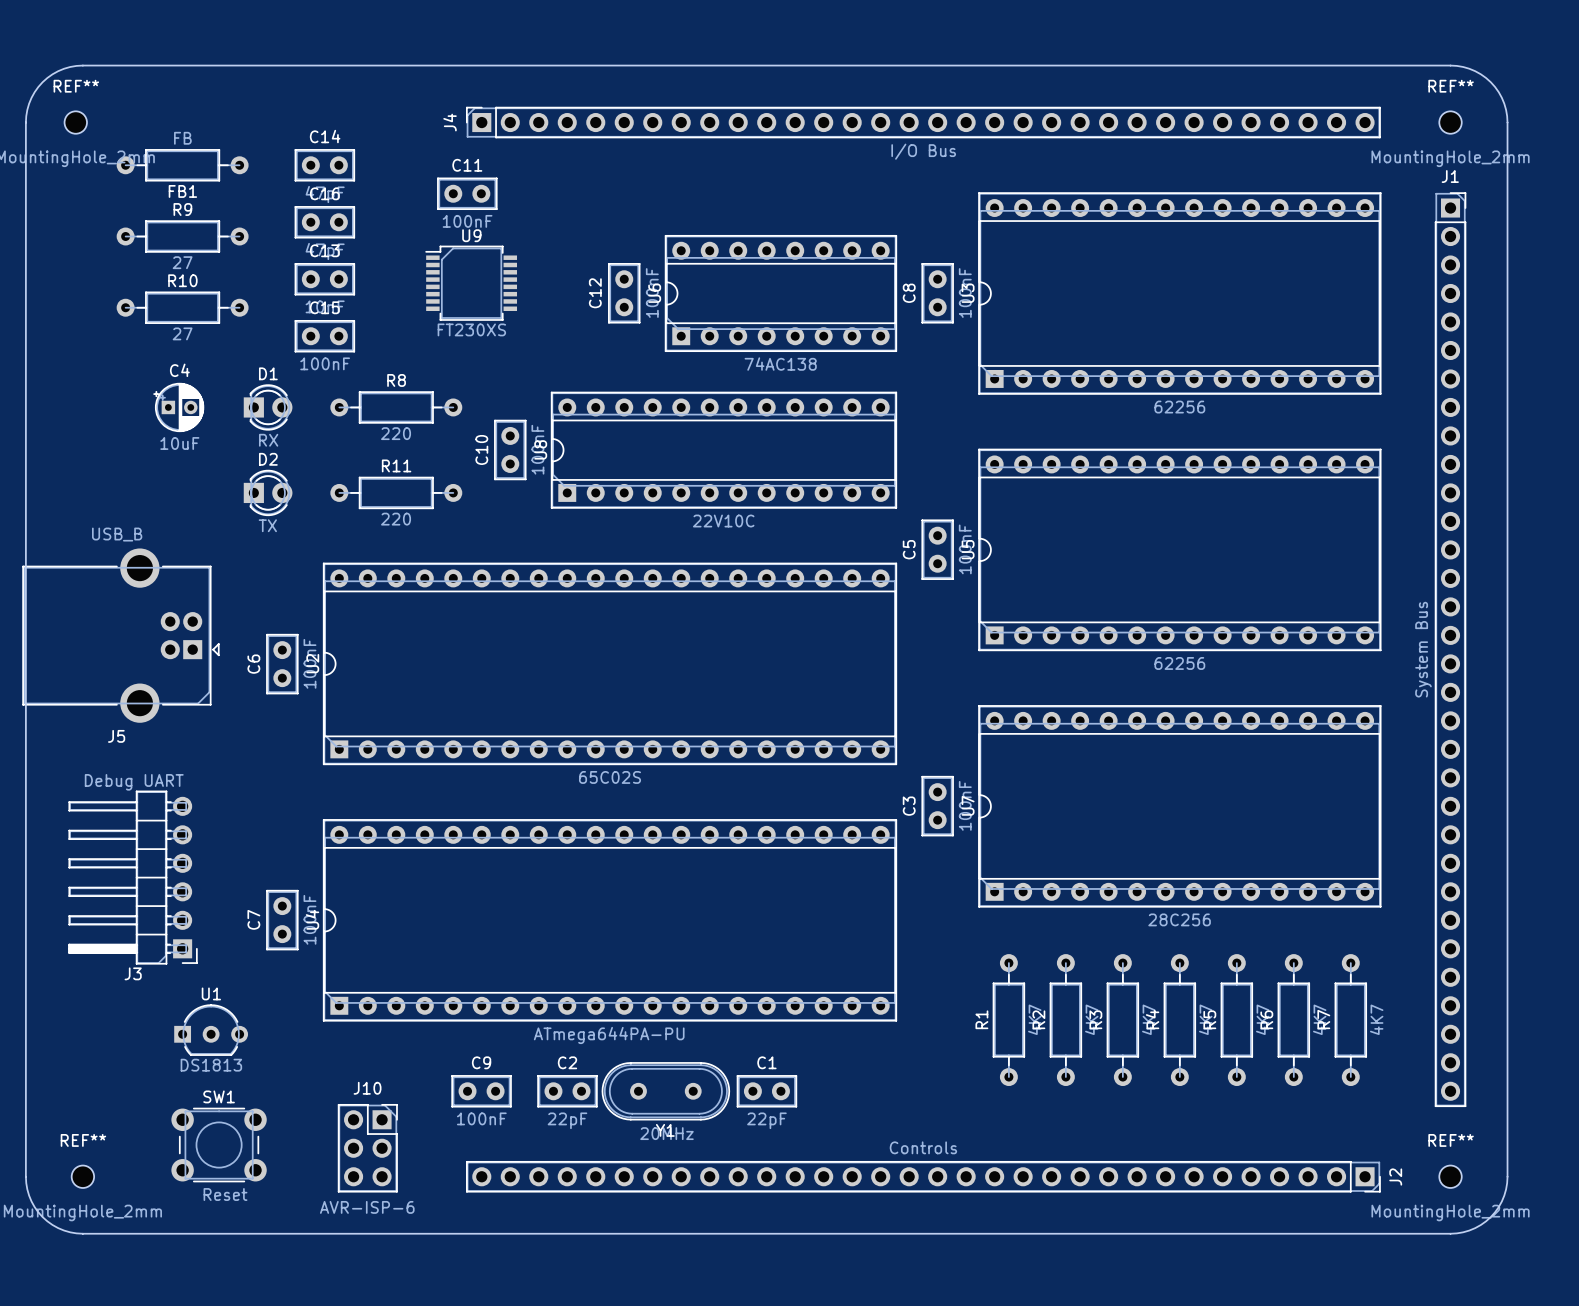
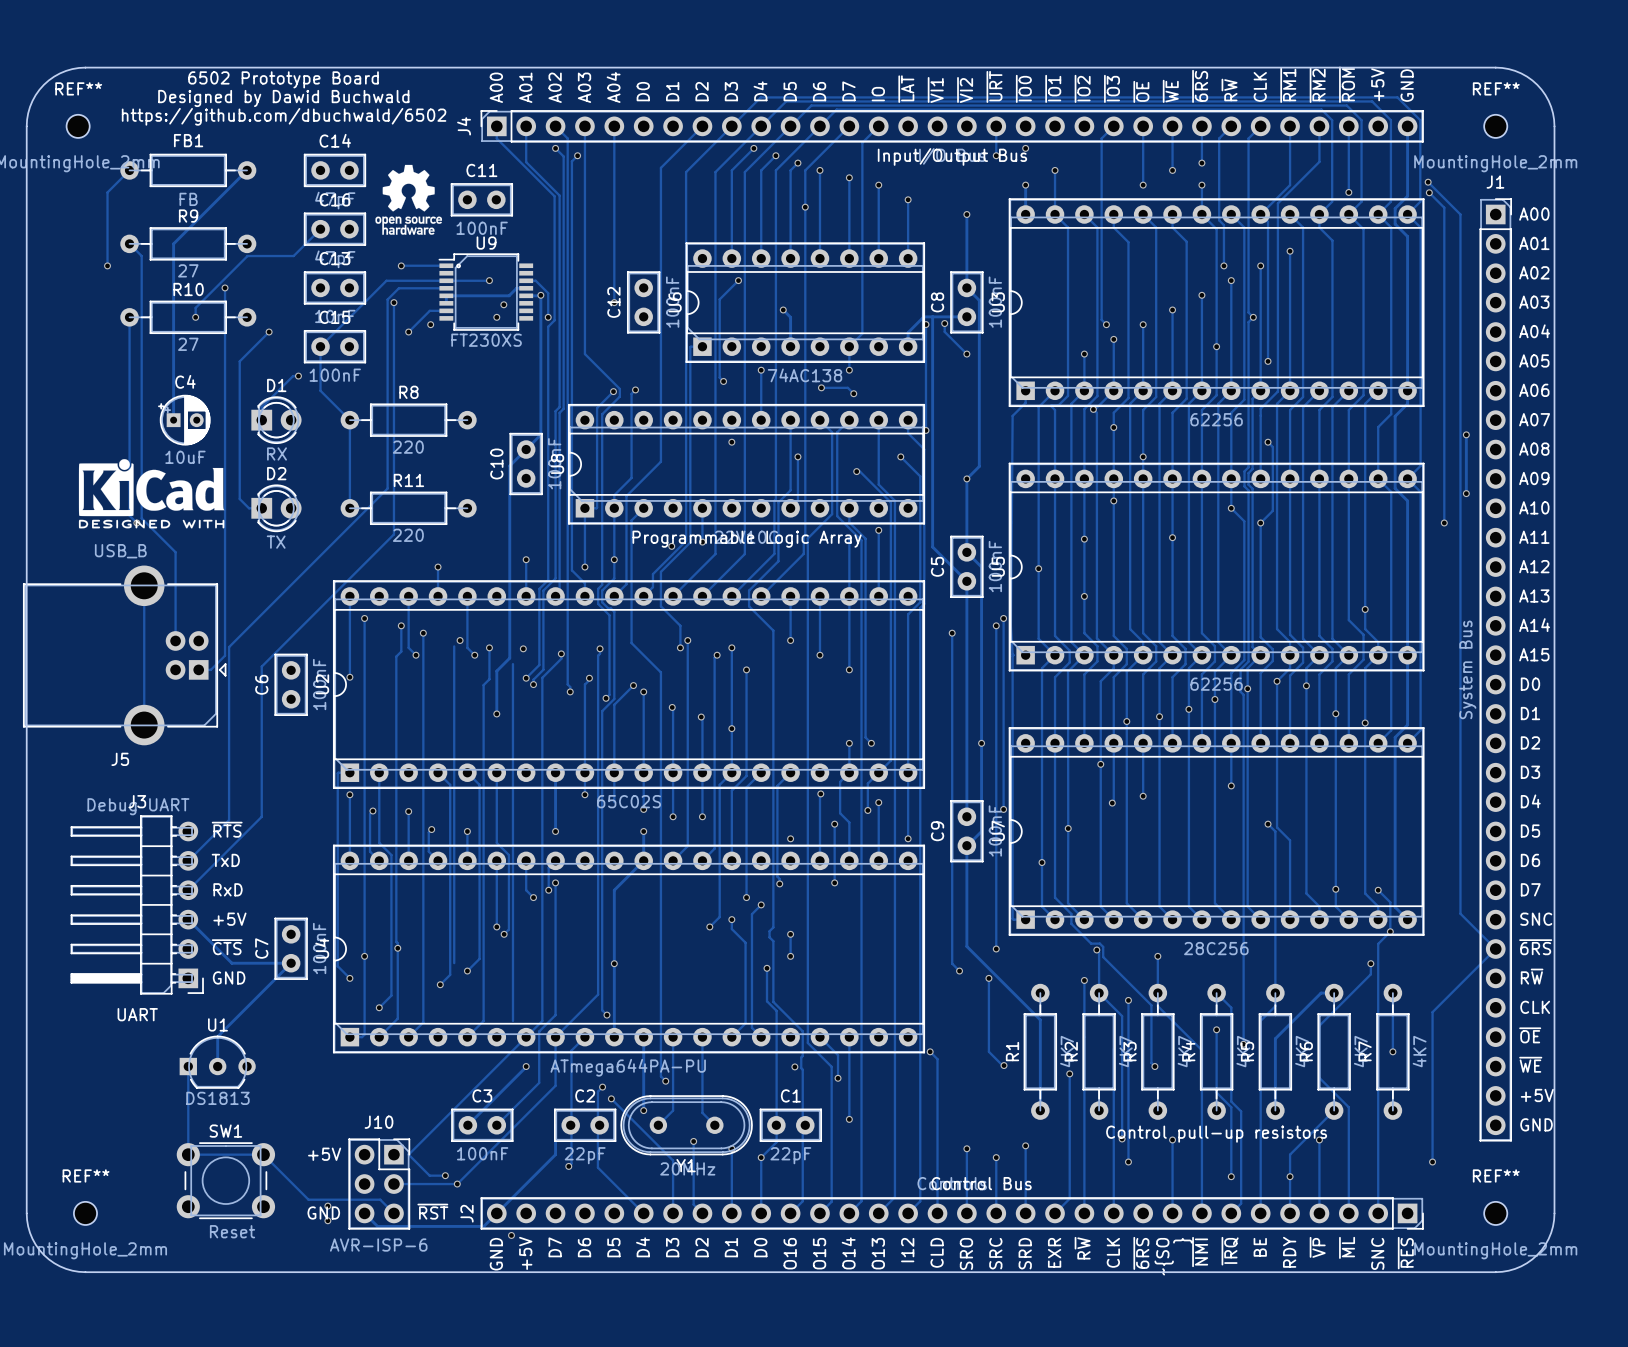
text: none -> 6502 Prototype Board (283, 79)
text: none -> ~{RM1} (1288, 85)
text: none -> ~{RM2} (1317, 85)
text: none -> ~{ROM} (1347, 84)
text: none -> +5V (1377, 84)
text: none -> GND (1407, 85)
text: none -> ~{6RS} (1200, 86)
text: none -> A04 (613, 87)
text: none -> ~{URT} (994, 86)
text: none -> CLK (1260, 86)
text: none -> A00 (496, 87)
text: none -> A01 (525, 87)
text: none -> A02 (555, 87)
text: none -> A03 (584, 87)
text: none -> ~{LAT} (906, 89)
text: none -> ~{IO0} (1023, 88)
text: none -> ~{IO1} (1053, 88)
text: none -> ~{IO2} (1082, 88)
text: none -> ~{IO3} (1112, 88)
text: none -> ~{VI1} (935, 89)
text: none -> ~{VI2} (965, 89)
text: none -> R~{W} (1229, 89)
text: none -> D0 (643, 91)
text: none -> D1 (672, 91)
text: none -> D2 (702, 91)
text: none -> D3 (731, 91)
text: none -> D4 (760, 91)
text: none -> D5 (790, 91)
text: none -> D6 (819, 91)
text: none -> D7 (848, 91)
text: none -> ~{WE} (1170, 91)
text: none -> ~{OE} (1141, 91)
text: none -> IO (878, 94)
text: none -> Designed by Dawid Buchwald (283, 98)
text: none -> https://github.com/dbuchwald/6502 (284, 116)
track: none -> (496, 126) (496, 138) (554, 196) (554, 320) (548, 326) (548, 580) (539, 588) (539, 665) (526, 678)
track: none -> (526, 126) (526, 162) (559, 195) (559, 407) (555, 411) (555, 578) (543, 590) (543, 669) (533, 679) (533, 684)
track: none -> (555, 126) (567, 138) (567, 684) (570, 687) (570, 691)
track: none -> (584, 126) (584, 354) (619, 388) (619, 396) (602, 414) (602, 584) (598, 588) (598, 603) (609, 615) (609, 694) (606, 698)
track: none -> (614, 126) (614, 302)
track: none -> (702, 126) (660, 167) (660, 461) (626, 496) (626, 584) (614, 596)
track: none -> (849, 126) (805, 170) (803, 553) (761, 596)
track: none -> (878, 126) (862, 142) (862, 333) (849, 346) (849, 370)
track: none -> (996, 126) (996, 155)
track: none -> (1113, 126) (1101, 138) (1101, 319) (1106, 324)
track: none -> (1143, 126) (1143, 185)
track: none -> (1172, 126) (1172, 170)
track: none -> (1201, 126) (1201, 163)
track: none -> (1231, 126) (1219, 138) (1219, 220) (1223, 225) (1223, 265)
track: none -> (1260, 126) (1248, 138) (1248, 312) (1253, 317) (1248, 322) (1248, 467) (1244, 471) (1244, 486) (1248, 490) (1248, 661) (1240, 669) (1240, 691) (1243, 694) (1243, 1044)
track: none -> (1290, 126) (1290, 185) (1260, 214) (1268, 221) (1268, 361)
track: none -> (1319, 126) (1319, 161) (1277, 203) (1277, 391) (1260, 408) (1260, 478)
track: none -> (1348, 126) (1348, 192)
track: none -> (1407, 126) (1407, 196) (1395, 208) (1395, 224) (1407, 236) (1407, 403) (1395, 416) (1395, 488) (1407, 500) (1407, 724) (1395, 737) (1395, 907) (1407, 919)
FB1 value position: FB (182, 138) -> FB (188, 199)
track: none -> (555, 148) (563, 156) (563, 408) (559, 412) (559, 592) (555, 596)
via: none -> (555, 148)
track: none -> (753, 148) (731, 170) (731, 258)
via: none -> (753, 148)
via: none -> (1025, 148)
track: none -> (577, 155) (571, 161) (571, 570) (584, 583) (584, 596)
via: none -> (577, 155)
track: none -> (775, 155) (761, 170) (761, 258)
via: none -> (775, 155)
via: none -> (996, 155)
text: none -> Input/Output Bus (952, 156)
track: none -> (797, 163) (790, 170) (790, 258)
via: none -> (797, 163)
via: none -> (1201, 163)
drawing: none -> [375, 164, 443, 235]
track: none -> (129, 170) (107, 192) (107, 265)
track: none -> (247, 170) (173, 243) (173, 420)
track: none -> (819, 170) (819, 258)
via: none -> (819, 170)
track: none -> (1055, 170) (1055, 214) (1068, 227) (1068, 395) (1058, 405) (1051, 405) (1055, 410) (1055, 635) (1069, 650) (1069, 662) (1055, 677) (1055, 897) (1071, 913) (1071, 923) (1091, 943) (1099, 943) (1103, 946) (1103, 957) (1151, 1005) (1151, 1063) (1154, 1066)
via: none -> (1055, 170)
via: none -> (1172, 170)
track: none -> (849, 177) (849, 258)
via: none -> (849, 177)
track: none -> (1428, 182) (1460, 214) (1460, 913) (1495, 949) (1432, 1012) (1432, 1162)
via: none -> (1428, 182)
track: none -> (878, 185) (878, 258)
via: none -> (878, 185)
track: none -> (1025, 185) (1025, 214)
via: none -> (1025, 185)
via: none -> (1143, 185)
track: none -> (1201, 185) (1201, 214) (1216, 229) (1216, 395) (1201, 410) (1201, 633) (1214, 646) (1214, 661) (1201, 674) (1201, 743)
via: none -> (1201, 185)
via: none -> (1348, 192)
track: none -> (1429, 192) (1444, 207) (1444, 522)
via: none -> (1429, 192)
FB1 name position: FB1 (182, 191) -> FB1 (188, 140)
track: none -> (908, 199) (908, 258)
via: none -> (908, 199)
via: none -> (805, 207)
text: none -> A00 (1534, 214)
track: none -> (966, 214) (966, 287) (979, 300) (979, 466) (966, 478) (966, 552) (981, 567) (981, 831) (966, 846) (966, 946) (1040, 1019) (1040, 1110)
via: none -> (966, 214)
track: none -> (1084, 214) (1097, 227) (1097, 396) (1084, 409) (1084, 633) (1097, 646) (1097, 661) (1084, 674) (1084, 743)
track: none -> (1113, 214) (1113, 227) (1128, 242) (1128, 398) (1113, 412) (1113, 635) (1126, 648) (1126, 664) (1113, 677) (1112, 803)
track: none -> (1143, 214) (1156, 227) (1156, 397) (1143, 410) (1143, 633) (1156, 646) (1156, 661) (1143, 674) (1143, 796)
track: none -> (1172, 214) (1172, 227) (1186, 241) (1186, 398) (1172, 412) (1172, 635) (1185, 648) (1185, 664) (1172, 677) (1172, 743)
track: none -> (1231, 214) (1244, 227) (1244, 399) (1231, 412) (1231, 508) (1244, 521) (1244, 660) (1231, 673) (1231, 785)
track: none -> (1290, 214) (1303, 227) (1303, 397) (1290, 410) (1290, 634) (1303, 647) (1303, 662) (1290, 675) (1290, 743)
track: none -> (320, 229) (293, 256) (247, 256) (195, 307) (195, 317)
track: none -> (129, 243) (141, 256) (141, 518) (175, 552) (175, 640)
text: none -> A01 (1534, 243)
track: none -> (1290, 251) (1290, 390) (1277, 403) (1277, 629) (1290, 642) (1290, 668) (1277, 681) (1277, 827) (1290, 840) (1290, 919)
via: none -> (1290, 251)
drawing: none -> [456, 263, 461, 269]
via: none -> (107, 265)
via: none -> (401, 265)
track: none -> (446, 265) (401, 265)
via: none -> (1223, 265)
track: none -> (1260, 265) (1260, 390) (1252, 398) (1252, 469) (1248, 473) (1248, 484) (1252, 488) (1252, 647) (1260, 655) (1247, 668) (1247, 906) (1260, 919)
via: none -> (1260, 265)
text: none -> A02 (1534, 272)
track: none -> (489, 280) (386, 280) (320, 346) (320, 390) (349, 420) (349, 508)
via: none -> (489, 280)
track: none -> (526, 280) (535, 280) (548, 293) (548, 317)
track: none -> (738, 280) (719, 299) (719, 377) (723, 381)
via: none -> (738, 280)
track: none -> (1231, 280) (1231, 390) (1218, 403) (1218, 642) (1231, 655) (1214, 671) (1214, 903) (1231, 919)
via: none -> (1231, 280)
track: none -> (225, 287) (225, 655) (210, 669) (198, 669)
via: none -> (225, 287)
track: none -> (446, 288) (398, 288) (387, 299) (387, 488) (229, 647) (229, 820) (188, 860)
track: none -> (526, 288) (516, 288) (509, 295) (446, 295) (446, 303)
track: none -> (526, 295) (540, 295) (540, 434) (509, 465) (509, 658) (496, 671) (496, 713)
via: none -> (540, 295)
track: none -> (1201, 295) (1201, 390) (1188, 403) (1188, 642) (1201, 655) (1188, 668) (1188, 906) (1201, 919)
via: none -> (1201, 295)
track: none -> (393, 302) (393, 534) (261, 666) (261, 816) (188, 890)
via: none -> (393, 302)
via: none -> (614, 302)
text: none -> A03 (1534, 302)
via: none -> (503, 304)
track: none -> (783, 309) (790, 317) (790, 346)
via: none -> (783, 309)
track: none -> (1172, 309) (1172, 390) (1159, 403) (1159, 642) (1172, 655) (1159, 668) (1159, 906) (1172, 919)
via: none -> (1172, 309)
track: none -> (446, 310) (429, 310) (408, 332)
track: none -> (129, 317) (129, 515) (136, 522)
via: none -> (195, 317)
via: none -> (496, 317)
via: none -> (548, 317)
track: none -> (932, 316) (932, 547) (966, 581) (966, 817)
track: none -> (966, 316) (923, 316) (908, 332) (908, 346)
via: none -> (1253, 317)
track: none -> (944, 323) (944, 331) (966, 354)
via: none -> (944, 323)
via: none -> (430, 324)
track: none -> (925, 324) (925, 430)
via: none -> (925, 324)
via: none -> (1106, 324)
track: none -> (1143, 324) (1143, 390) (1130, 403) (1130, 629) (1143, 642) (1143, 655) (1126, 671) (1126, 903) (1143, 919)
via: none -> (1143, 324)
track: none -> (269, 332) (239, 361) (239, 498) (249, 508) (261, 508)
via: none -> (269, 332)
via: none -> (408, 332)
text: none -> A04 (1534, 331)
track: none -> (1113, 339) (1113, 390) (1093, 409) (1096, 412) (1096, 638) (1113, 655) (1113, 668) (1100, 681) (1100, 906) (1113, 919)
via: none -> (1113, 339)
track: none -> (702, 346) (690, 347) (690, 542) (660, 571) (660, 606) (680, 625) (680, 647)
via: none -> (1216, 346)
via: none -> (966, 354)
track: none -> (1084, 354) (1084, 390) (1071, 403) (1071, 642) (1084, 655) (1068, 671) (1068, 903) (1084, 919)
via: none -> (1084, 354)
via: none -> (1268, 361)
text: none -> A05 (1534, 360)
track: none -> (761, 370) (761, 420)
via: none -> (761, 370)
via: none -> (849, 370)
track: none -> (298, 376) (293, 376) (261, 407) (261, 420)
via: none -> (298, 376)
via: none -> (723, 381)
track: none -> (821, 387) (847, 387) (853, 393)
via: none -> (821, 387)
track: none -> (635, 389) (631, 393) (631, 477) (614, 495) (614, 578) (602, 590) (602, 602) (614, 611) (614, 699) (602, 711) (602, 1010) (606, 1015)
via: none -> (635, 389)
track: none -> (1025, 390) (1025, 402) (1012, 415) (1010, 625) (1013, 655) (1012, 918) (1025, 919)
track: none -> (1055, 390) (1038, 407) (1038, 638) (1055, 655) (1042, 668) (1042, 906) (1055, 919)
track: none -> (1319, 390) (1303, 407) (1303, 638) (1319, 655) (1306, 668) (1306, 893) (1319, 906) (1319, 919)
track: none -> (1348, 390) (1332, 407) (1332, 638) (1348, 655) (1335, 668) (1335, 906) (1348, 919)
track: none -> (1378, 390) (1365, 403) (1365, 629) (1378, 642) (1378, 655) (1365, 668) (1365, 893) (1378, 906) (1378, 919)
text: none -> A06 (1534, 390)
track: none -> (613, 391) (597, 408) (597, 507) (584, 508) (584, 567)
via: none -> (613, 391)
via: none -> (853, 393)
via: none -> (1093, 409)
track: none -> (790, 420) (790, 490) (778, 502) (778, 561) (749, 590) (749, 606) (773, 630) (773, 927) (769, 931) (769, 937) (773, 941) (773, 1001) (802, 1031) (801, 1057) (802, 1201) (790, 1213)
track: none -> (819, 420) (832, 432) (832, 514) (807, 538) (807, 1042) (831, 1066) (831, 1201) (819, 1213)
track: none -> (849, 420) (837, 432) (837, 516) (861, 540) (861, 1201) (849, 1213)
track: none -> (878, 420) (878, 484) (894, 500) (894, 1197) (878, 1213)
track: none -> (908, 420) (908, 433) (924, 449) (924, 603) (920, 607) (920, 1201) (908, 1213)
text: none -> A07 (1534, 419)
via: none -> (1113, 427)
via: none -> (925, 430)
track: none -> (1466, 434) (1466, 493)
via: none -> (1466, 434)
via: none -> (731, 442)
track: none -> (1268, 442) (1272, 446) (1272, 510) (1260, 522) (1260, 637) (1272, 649) (1272, 661) (1260, 673) (1260, 743)
via: none -> (1268, 442)
text: none -> A08 (1534, 449)
track: none -> (797, 456) (797, 500) (790, 508)
via: none -> (797, 456)
track: none -> (900, 456) (920, 476) (920, 602) (908, 614) (908, 838)
via: none -> (900, 456)
via: none -> (1143, 456)
drawing: none -> [78, 459, 225, 529]
track: none -> (856, 471) (859, 471) (890, 502) (890, 760) (867, 783) (867, 810)
via: none -> (856, 471)
via: none -> (966, 478)
text: none -> A09 (1534, 478)
via: none -> (1466, 493)
via: none -> (1113, 500)
track: none -> (643, 508) (631, 520) (631, 643) (660, 672) (660, 1076) (665, 1081)
track: none -> (702, 508) (702, 542)
track: none -> (849, 508) (849, 522) (865, 538) (865, 737) (871, 743)
via: none -> (1231, 508)
text: none -> A10 (1534, 507)
via: none -> (136, 522)
via: none -> (1260, 522)
via: none -> (1444, 522)
track: none -> (878, 530) (878, 596)
via: none -> (878, 530)
track: none -> (849, 537) (849, 669)
via: none -> (1172, 537)
text: none -> A11 (1534, 537)
text: none -> Programmable Logic Array (747, 539)
via: none -> (1084, 539)
via: none -> (702, 542)
via: none -> (671, 546)
track: none -> (526, 559) (526, 596)
via: none -> (526, 559)
via: none -> (614, 559)
track: none -> (438, 567) (438, 596)
via: none -> (438, 567)
via: none -> (584, 567)
text: none -> A12 (1534, 566)
via: none -> (1038, 568)
track: none -> (144, 585) (144, 725)
track: none -> (349, 596) (349, 677)
track: none -> (408, 596) (408, 647) (416, 655)
track: none -> (467, 596) (467, 647) (474, 655)
track: none -> (643, 596) (652, 587) (652, 574) (686, 540) (686, 172) (760, 97) (1397, 97) (1420, 120) (1420, 201) (1407, 214) (1420, 227) (1420, 465) (1407, 478) (1420, 491) (1420, 730) (1407, 743)
track: none -> (673, 596) (715, 554) (715, 172) (786, 101) (1372, 101) (1390, 120) (1390, 201) (1378, 214) (1391, 227) (1391, 414) (1378, 427) (1378, 478) (1391, 491) (1391, 730) (1378, 743)
track: none -> (702, 596) (744, 554) (744, 172) (811, 105) (1346, 105) (1361, 120) (1361, 201) (1348, 214) (1363, 229) (1363, 395) (1348, 410) (1348, 620) (1363, 634) (1363, 659) (1348, 674) (1348, 743)
track: none -> (731, 596) (774, 553) (775, 170) (836, 109) (1321, 109) (1332, 120) (1332, 201) (1319, 214) (1319, 227) (1332, 240) (1332, 397) (1319, 410) (1319, 635) (1332, 648) (1332, 661) (1319, 674) (1319, 743)
track: none -> (790, 596) (790, 640)
track: none -> (819, 596) (819, 655)
via: none -> (1084, 596)
text: none -> A13 (1534, 596)
via: none -> (1365, 609)
track: none -> (364, 618) (364, 1034) (362, 1037) (349, 1037)
via: none -> (364, 618)
track: none -> (1003, 618) (1003, 809)
via: none -> (1003, 618)
track: none -> (401, 625) (401, 651) (396, 656) (397, 1018) (379, 1037)
via: none -> (401, 625)
track: none -> (996, 625) (996, 949)
via: none -> (996, 625)
text: none -> A14 (1534, 625)
track: none -> (423, 633) (423, 1022) (408, 1037)
via: none -> (423, 633)
track: none -> (952, 633) (952, 963) (959, 971)
via: none -> (952, 633)
via: none -> (460, 640)
track: none -> (687, 640) (687, 846) (673, 860)
via: none -> (687, 640)
via: none -> (790, 640)
track: none -> (454, 646) (454, 963)
track: none -> (489, 647) (489, 679) (483, 685) (483, 1020) (467, 1037)
via: none -> (489, 647)
via: none -> (680, 647)
track: none -> (731, 647) (731, 772) (719, 784) (719, 917) (709, 926)
via: none -> (731, 647)
via: none -> (523, 648)
track: none -> (600, 648) (598, 655) (598, 994) (555, 1037) (555, 1085) (457, 1184) (393, 1184)
via: none -> (600, 648)
track: none -> (561, 653) (561, 658) (542, 677) (542, 1020) (408, 1154) (429, 1175) (445, 1175)
via: none -> (561, 653)
text: none -> A15 (1534, 654)
via: none -> (416, 655)
via: none -> (474, 655)
track: none -> (717, 655) (714, 657) (714, 848) (702, 860)
via: none -> (717, 655)
via: none -> (819, 655)
track: none -> (512, 664) (512, 1020)
track: none -> (746, 669) (746, 776) (731, 790) (731, 860)
via: none -> (746, 669)
via: none -> (849, 669)
via: none -> (349, 677)
via: none -> (526, 678)
track: none -> (589, 678) (584, 684) (584, 794)
via: none -> (589, 678)
via: none -> (1277, 681)
via: none -> (533, 684)
text: none -> D0 (1530, 684)
track: none -> (633, 685) (614, 704) (614, 802)
via: none -> (633, 685)
via: none -> (1306, 685)
via: none -> (1247, 688)
via: none -> (570, 691)
track: none -> (643, 691) (643, 809)
via: none -> (643, 691)
via: none -> (606, 698)
via: none -> (1214, 699)
track: none -> (672, 707) (673, 816)
via: none -> (672, 707)
via: none -> (1188, 709)
text: none -> D1 (1530, 713)
via: none -> (496, 713)
via: none -> (1335, 713)
track: none -> (701, 717) (702, 816)
via: none -> (701, 717)
via: none -> (1159, 716)
via: none -> (1126, 721)
via: none -> (1365, 722)
via: none -> (731, 728)
track: none -> (849, 743) (849, 772) (840, 781) (840, 813) (849, 822) (849, 860)
via: none -> (849, 743)
via: none -> (871, 743)
via: none -> (981, 743)
text: none -> D2 (1530, 742)
via: none -> (1100, 764)
text: none -> D3 (1530, 772)
track: none -> (349, 772) (337, 773) (337, 966) (349, 978)
track: none -> (379, 772) (379, 842) (391, 855) (391, 995) (379, 1007)
track: none -> (438, 772) (450, 784) (450, 974) (440, 984)
track: none -> (467, 772) (479, 784) (479, 958) (467, 971)
track: none -> (496, 772) (496, 842) (508, 855) (508, 929) (504, 934)
track: none -> (555, 772) (555, 831)
track: none -> (761, 772) (746, 787) (746, 897)
track: none -> (790, 772) (777, 785) (777, 876) (779, 883)
via: none -> (1231, 785)
track: none -> (820, 793) (819, 860)
via: none -> (820, 793)
track: none -> (349, 794) (349, 860)
via: none -> (349, 794)
via: none -> (584, 794)
via: none -> (1143, 796)
text: none -> D4 (1530, 801)
track: none -> (878, 802) (878, 860)
via: none -> (878, 802)
via: none -> (1112, 803)
via: none -> (643, 809)
via: none -> (1003, 809)
via: none -> (867, 810)
track: none -> (372, 811) (370, 813) (370, 851) (379, 860)
via: none -> (372, 811)
track: none -> (408, 811) (408, 860)
via: none -> (408, 811)
via: none -> (673, 816)
via: none -> (702, 816)
track: none -> (834, 824) (834, 882)
via: none -> (834, 824)
track: none -> (1268, 824) (1275, 831) (1275, 1006) (1260, 1020) (1260, 1213)
via: none -> (1268, 824)
via: none -> (1068, 828)
text: none -> ~{RTS} (227, 829)
track: none -> (431, 829) (428, 832) (428, 851) (438, 860)
via: none -> (431, 829)
text: none -> D5 (1530, 831)
track: none -> (467, 831) (467, 860)
via: none -> (467, 831)
via: none -> (555, 831)
track: none -> (643, 831) (643, 860) (614, 890) (614, 1037)
via: none -> (643, 831)
C3 name: C3 (909, 806) -> C9 (937, 831)
via: none -> (790, 838)
via: none -> (908, 838)
text: none -> TxD (225, 860)
track: none -> (496, 860) (496, 926)
track: none -> (526, 860) (526, 890) (533, 897)
track: none -> (555, 860) (548, 867) (548, 890)
text: none -> D6 (1530, 860)
via: none -> (1042, 862)
track: none -> (555, 882) (555, 1015) (539, 1031) (539, 1082) (496, 1125)
via: none -> (555, 882)
via: none -> (834, 882)
via: none -> (779, 883)
text: none -> RxD (228, 889)
via: none -> (1335, 889)
text: none -> D7 (1530, 889)
via: none -> (548, 890)
track: none -> (1378, 890) (1390, 902) (1390, 931) (1378, 943) (1378, 1213)
via: none -> (1378, 890)
via: none -> (533, 897)
via: none -> (746, 897)
track: none -> (761, 904) (751, 914) (751, 1027) (761, 1037)
via: none -> (761, 904)
track: none -> (188, 919) (231, 963) (291, 963) (217, 1036) (217, 1066)
text: none -> +5V (229, 919)
track: none -> (731, 919) (731, 929) (745, 942) (745, 1023) (731, 1037)
via: none -> (731, 919)
text: none -> SNC (1536, 919)
via: none -> (496, 926)
via: none -> (709, 926)
via: none -> (1390, 931)
via: none -> (504, 934)
track: none -> (790, 934) (790, 956)
via: none -> (790, 934)
text: none -> ~{CTS} (227, 947)
text: none -> ~{6RS} (1535, 947)
via: none -> (397, 948)
via: none -> (996, 949)
track: none -> (1096, 949) (1099, 952) (1099, 993) (1122, 1016) (1122, 1138)
via: none -> (1096, 949)
via: none -> (364, 956)
via: none -> (790, 956)
track: none -> (1157, 956) (1157, 1006) (1201, 1050) (1201, 1213)
via: none -> (1157, 956)
via: none -> (614, 963)
track: none -> (1370, 963) (1370, 974) (1319, 1025) (1319, 1077) (1348, 1107) (1348, 1213)
via: none -> (1370, 963)
track: none -> (767, 968) (767, 1001) (776, 1010) (776, 1142) (761, 1157) (761, 1213)
via: none -> (767, 968)
via: none -> (467, 971)
via: none -> (959, 971)
text: none -> R~{W} (1532, 976)
text: none -> GND (229, 977)
via: none -> (349, 978)
track: none -> (988, 978) (988, 1051) (1004, 1065)
via: none -> (988, 978)
track: none -> (1084, 980) (1084, 1213)
via: none -> (1084, 980)
via: none -> (440, 984)
track: none -> (1216, 993) (1231, 1007) (1231, 1101) (1241, 1111) (1241, 1203) (1231, 1213)
track: none -> (1334, 993) (1321, 993) (1275, 1038) (1275, 1110)
track: none -> (1392, 993) (1392, 1051)
track: none -> (1128, 1000) (1128, 1162)
via: none -> (1128, 1000)
J3 name position: J3 (133, 973) -> J3 (137, 801)
text: none -> CLK (1535, 1007)
via: none -> (379, 1007)
text: none -> UART (137, 1014)
via: none -> (606, 1015)
track: none -> (1216, 1029) (1216, 1092) (1231, 1107) (1231, 1176)
via: none -> (1216, 1029)
text: none -> ~{OE} (1530, 1035)
track: none -> (584, 1037) (571, 1050) (571, 1163) (568, 1166)
track: none -> (643, 1037) (643, 1110)
track: none -> (673, 1037) (673, 1110) (658, 1125)
track: none -> (702, 1037) (702, 1112) (717, 1125)
track: none -> (819, 1037) (838, 1055) (838, 1078)
track: none -> (849, 1037) (849, 1119)
via: none -> (1243, 1044)
track: none -> (1113, 1048) (1113, 1213)
track: none -> (930, 1051) (937, 1059) (937, 1213)
via: none -> (930, 1051)
via: none -> (1392, 1051)
text: none -> ~{WE} (1530, 1064)
via: none -> (1004, 1065)
track: none -> (188, 1066) (188, 1154) (263, 1154) (308, 1199) (380, 1199) (393, 1213)
track: none -> (526, 1066) (467, 1125)
via: none -> (526, 1066)
via: none -> (794, 1066)
via: none -> (1154, 1066)
track: none -> (1069, 1073) (1069, 1198) (1055, 1213)
via: none -> (1069, 1073)
via: none -> (838, 1078)
via: none -> (665, 1081)
track: none -> (602, 1087) (597, 1091) (597, 1167) (643, 1213)
via: none -> (602, 1087)
text: none -> +5V (1537, 1095)
track: none -> (611, 1098) (673, 1160) (673, 1213)
via: none -> (611, 1098)
via: none -> (643, 1110)
track: none -> (1334, 1110) (1290, 1154) (1290, 1213)
via: none -> (849, 1119)
text: none -> GND (1536, 1124)
C3: none -> 100nF (482, 1125)
C9: 100nF (481, 1091) -> none
track: none -> (555, 1125) (555, 1154) (483, 1226) (377, 1226) (364, 1213)
text: none -> Control pull-up resistors (1216, 1134)
via: none -> (1122, 1138)
track: none -> (1172, 1139) (1172, 1213)
via: none -> (1172, 1139)
track: none -> (1319, 1139) (1319, 1213)
via: none -> (1319, 1139)
track: none -> (693, 1141) (693, 1204) (702, 1213)
via: none -> (693, 1141)
track: none -> (1025, 1145) (1025, 1213)
via: none -> (1025, 1145)
track: none -> (731, 1148) (731, 1213)
via: none -> (731, 1148)
track: none -> (966, 1148) (966, 1213)
via: none -> (966, 1148)
text: none -> +5V (324, 1154)
via: none -> (761, 1157)
track: none -> (996, 1157) (996, 1213)
via: none -> (996, 1157)
via: none -> (1128, 1162)
via: none -> (1432, 1162)
via: none -> (568, 1166)
via: none -> (445, 1175)
via: none -> (1231, 1176)
via: none -> (1290, 1176)
text: none -> Control Bus (981, 1183)
via: none -> (457, 1184)
via: none -> (327, 1206)
text: none -> ~{RST} (432, 1211)
text: none -> GND (323, 1212)
J2 name position: J2 (1395, 1177) -> J2 (466, 1213)
via: none -> (327, 1220)
via: none -> (511, 1235)
text: none -> } (1182, 1240)
text: none -> D7 (555, 1247)
text: none -> D6 (584, 1247)
text: none -> D5 (613, 1247)
text: none -> D4 (642, 1247)
text: none -> D3 (672, 1247)
text: none -> D2 (702, 1247)
text: none -> D1 (731, 1247)
text: none -> D0 (760, 1247)
text: none -> BE (1260, 1247)
text: none -> ~{VP} (1317, 1247)
text: none -> R~{W} (1082, 1248)
text: none -> ~{ML} (1347, 1247)
text: none -> I12 (907, 1250)
text: none -> ~{IRQ} (1230, 1251)
text: none -> CLD (937, 1252)
text: none -> EXR (1054, 1252)
text: none -> CLK (1113, 1252)
text: none -> ~{NMI} (1200, 1252)
text: none -> RDY (1289, 1252)
text: none -> +5V (525, 1253)
text: none -> O16 (790, 1253)
text: none -> O15 (819, 1253)
text: none -> O14 (848, 1253)
text: none -> O13 (878, 1253)
text: none -> SRC (995, 1253)
text: none -> SRD (1025, 1253)
text: none -> ~{6RS} (1141, 1253)
text: none -> ~{RES} (1405, 1253)
text: none -> GND (496, 1254)
text: none -> SRO (966, 1253)
text: none -> SNC (1377, 1253)
text: none -> ~{SO (1164, 1256)

